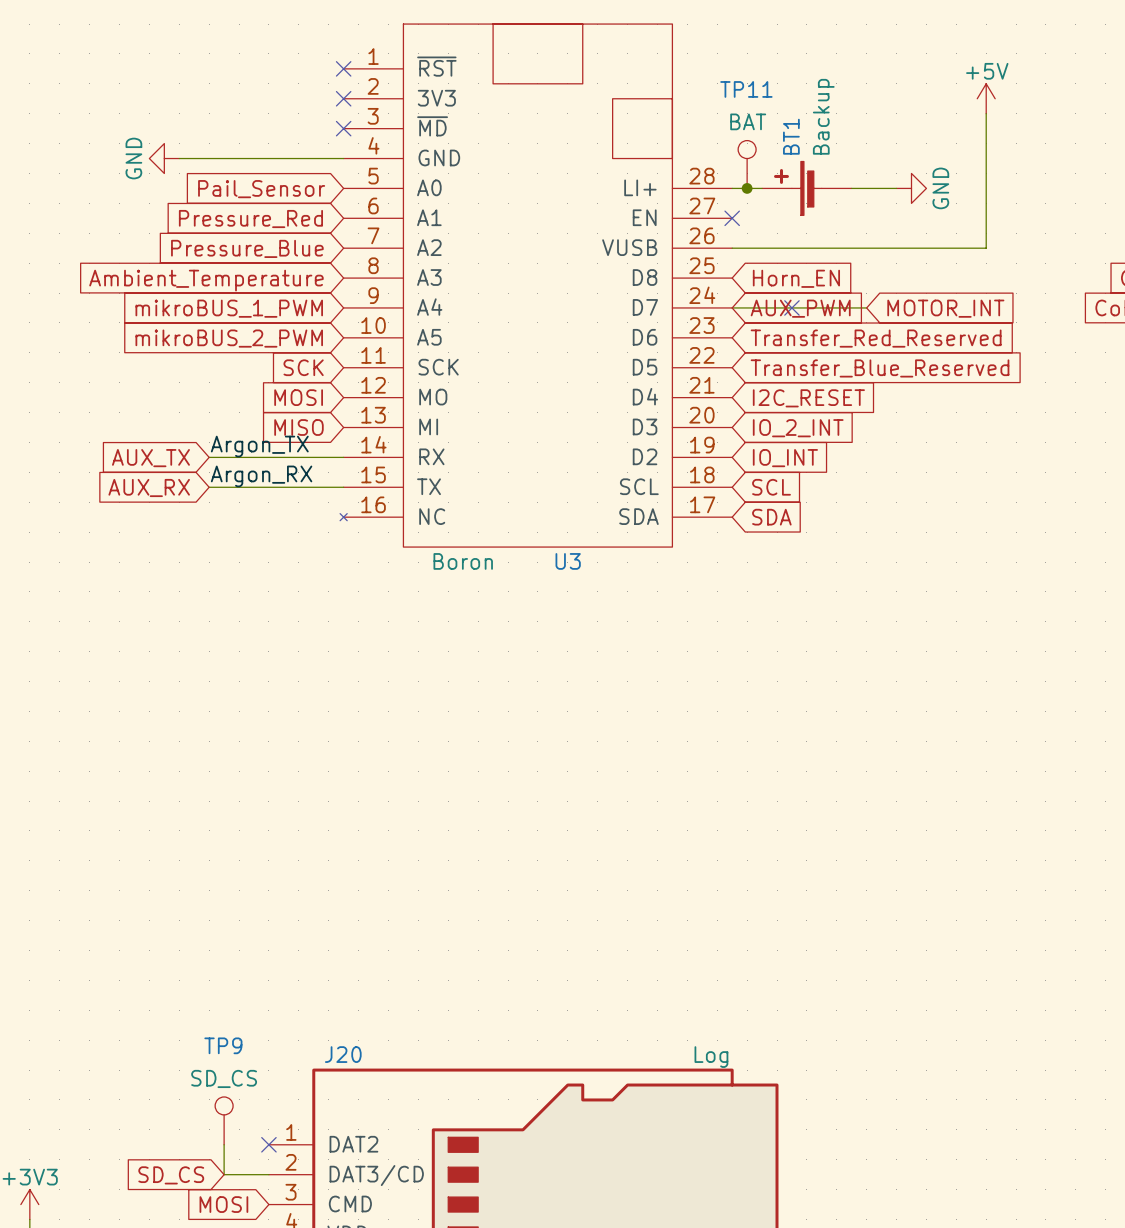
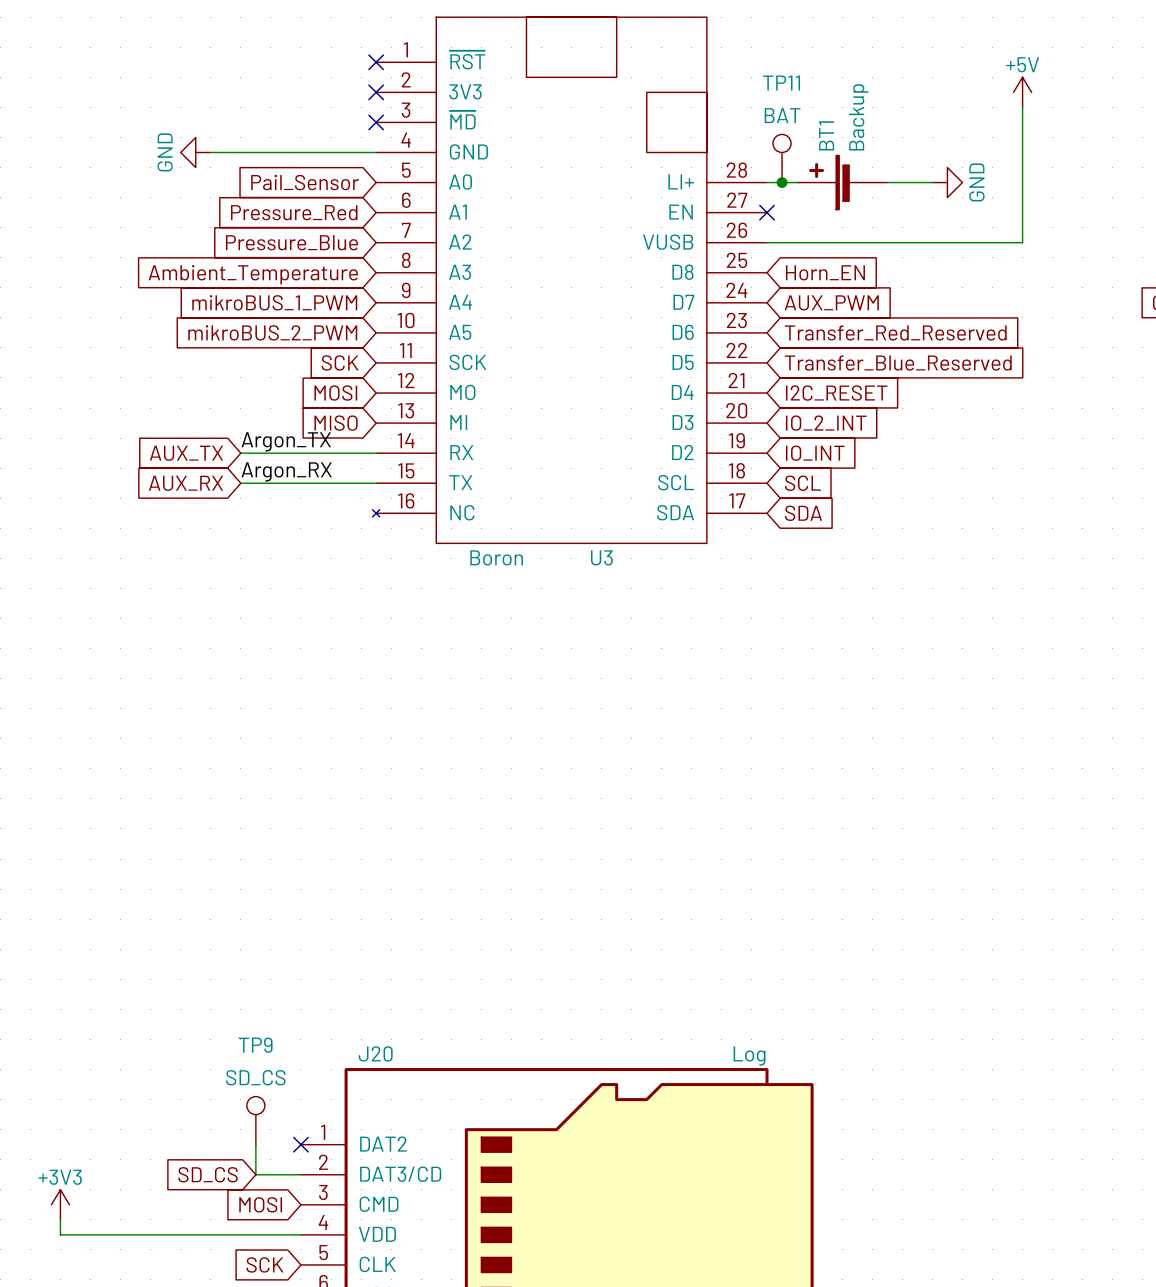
wire: (732, 307) (866, 307) -> none
no-connect mark: (791, 307) -> none
global label: MOTOR_INT (945, 308) -> none

